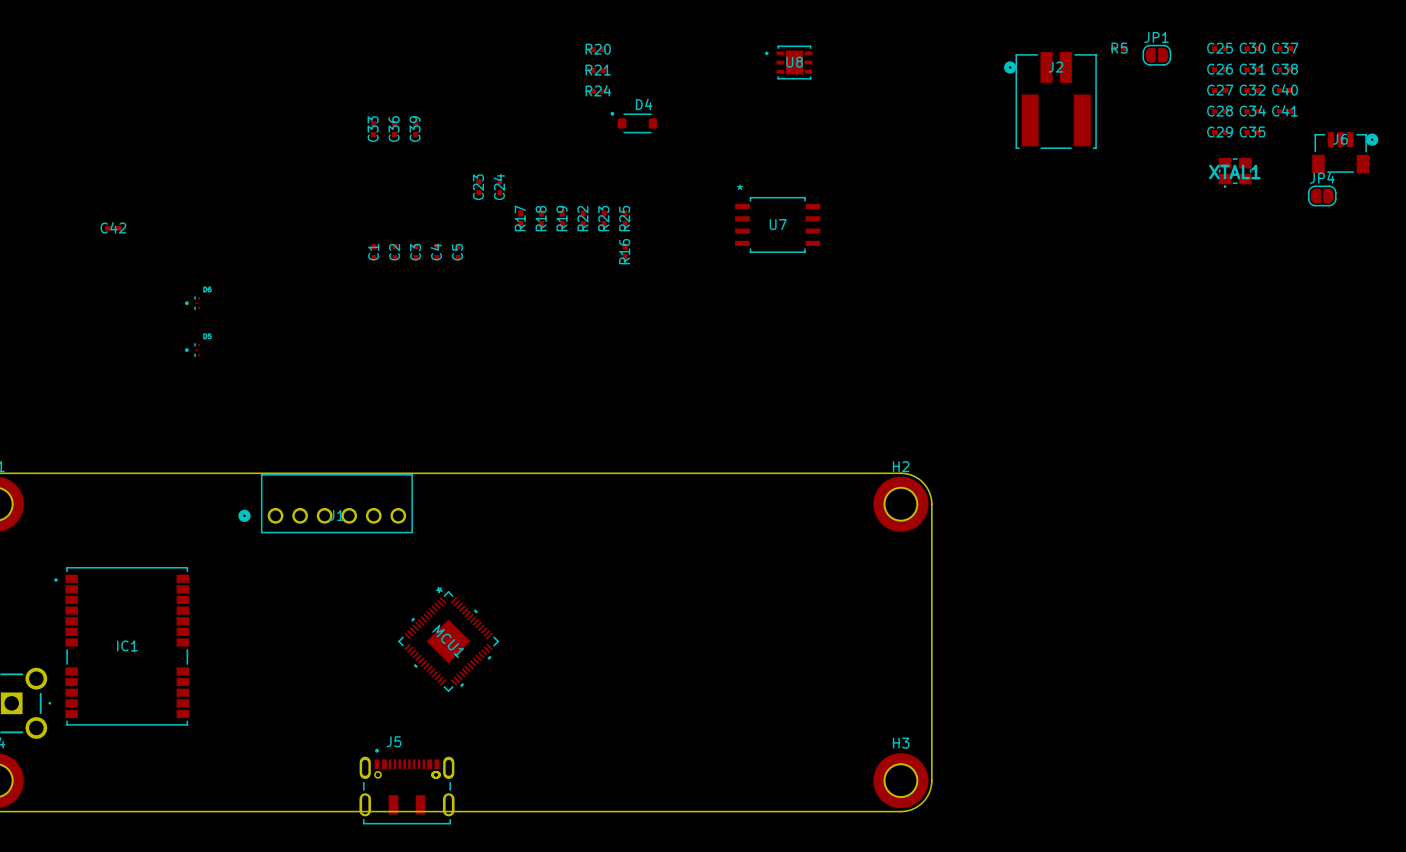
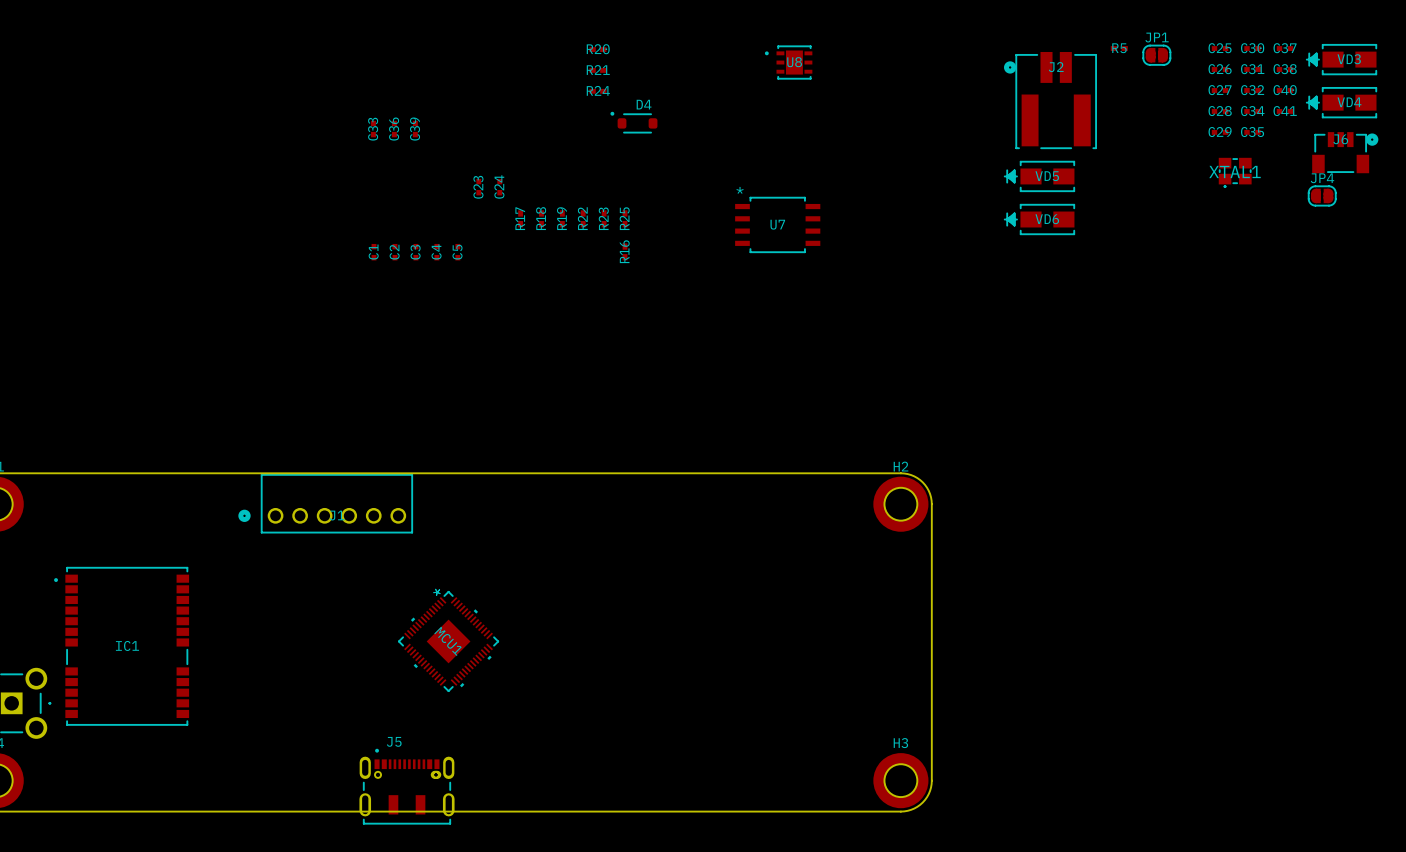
VD3: none -> (1341, 59)
VD4: none -> (1341, 102)
VD5: none -> (1039, 176)
VD6: none -> (1039, 219)
C42: (113, 228) -> none
part: (192, 303) -> none
part: (192, 350) -> none

